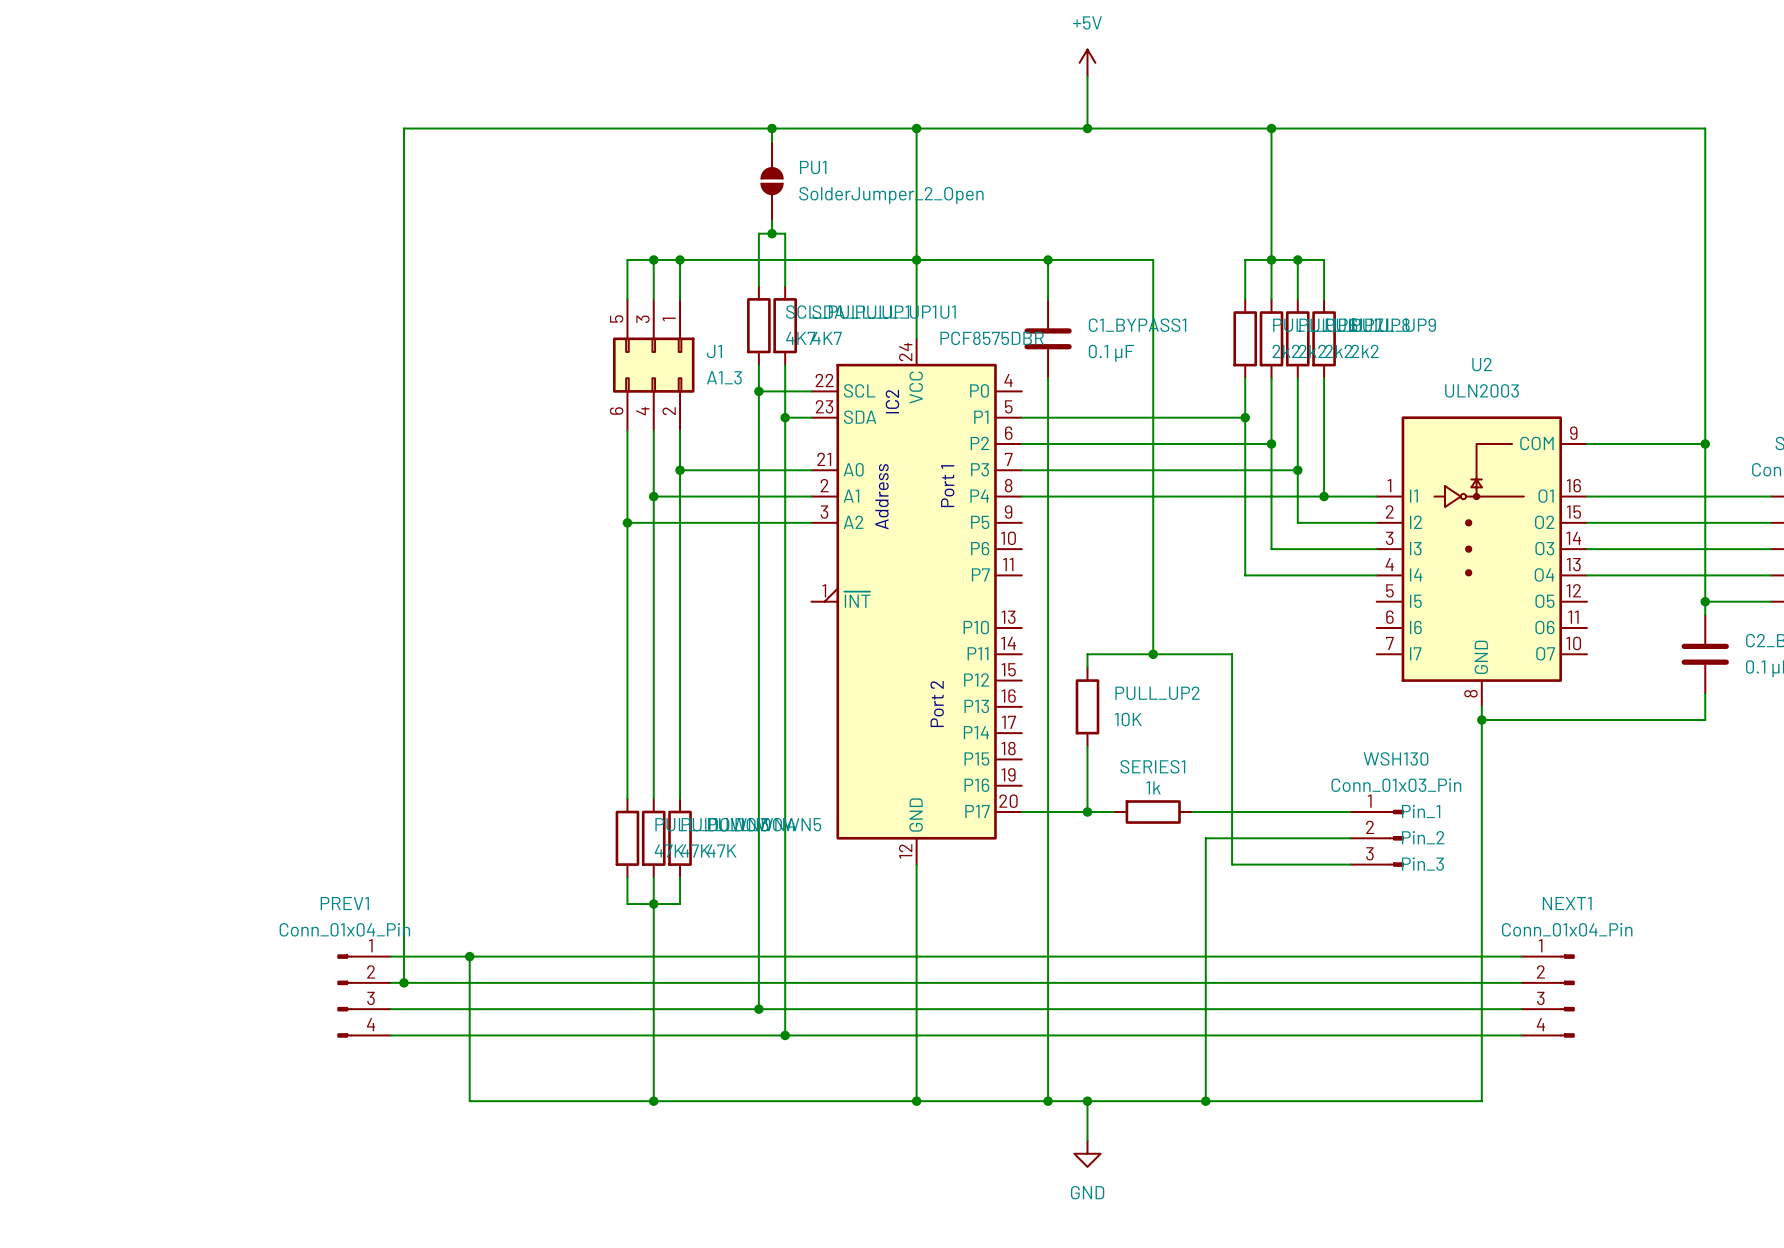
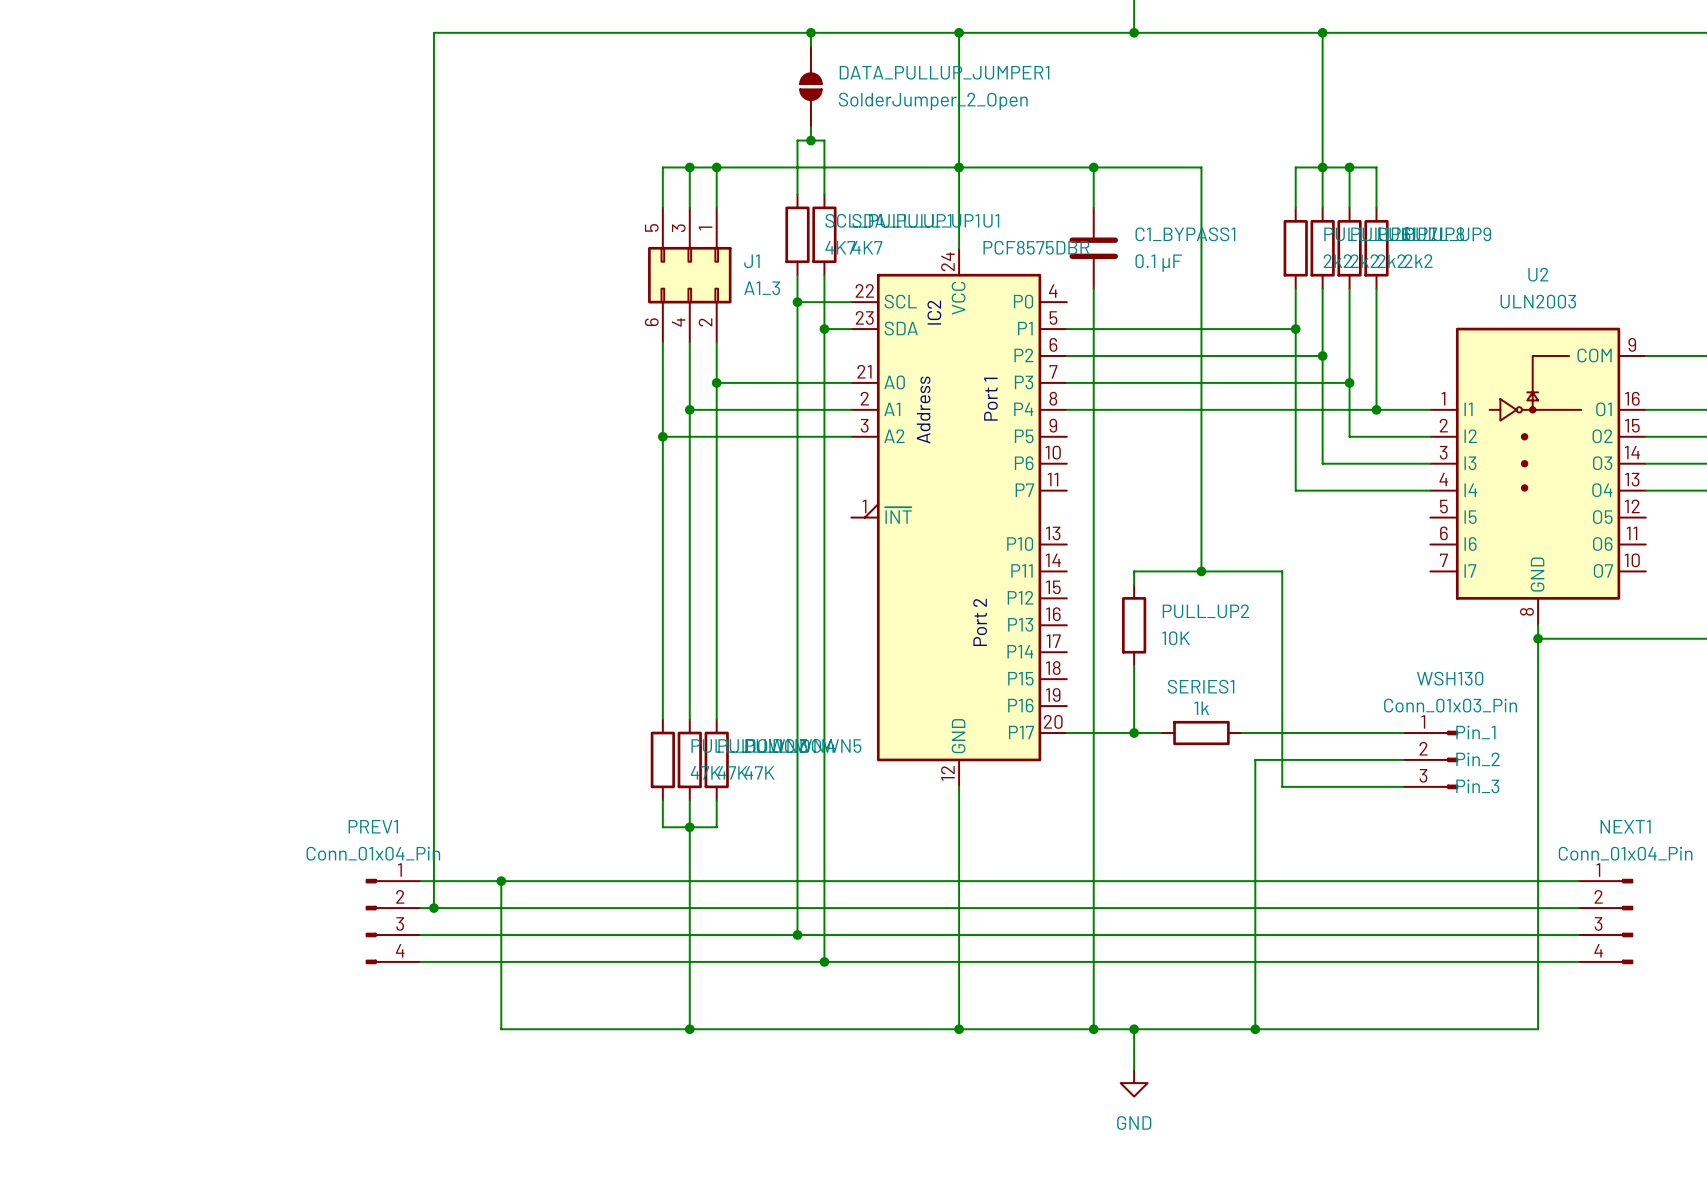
PU1 name: PU1 (813, 167) -> DATA_PULLUP_JUMPER1 (944, 72)

